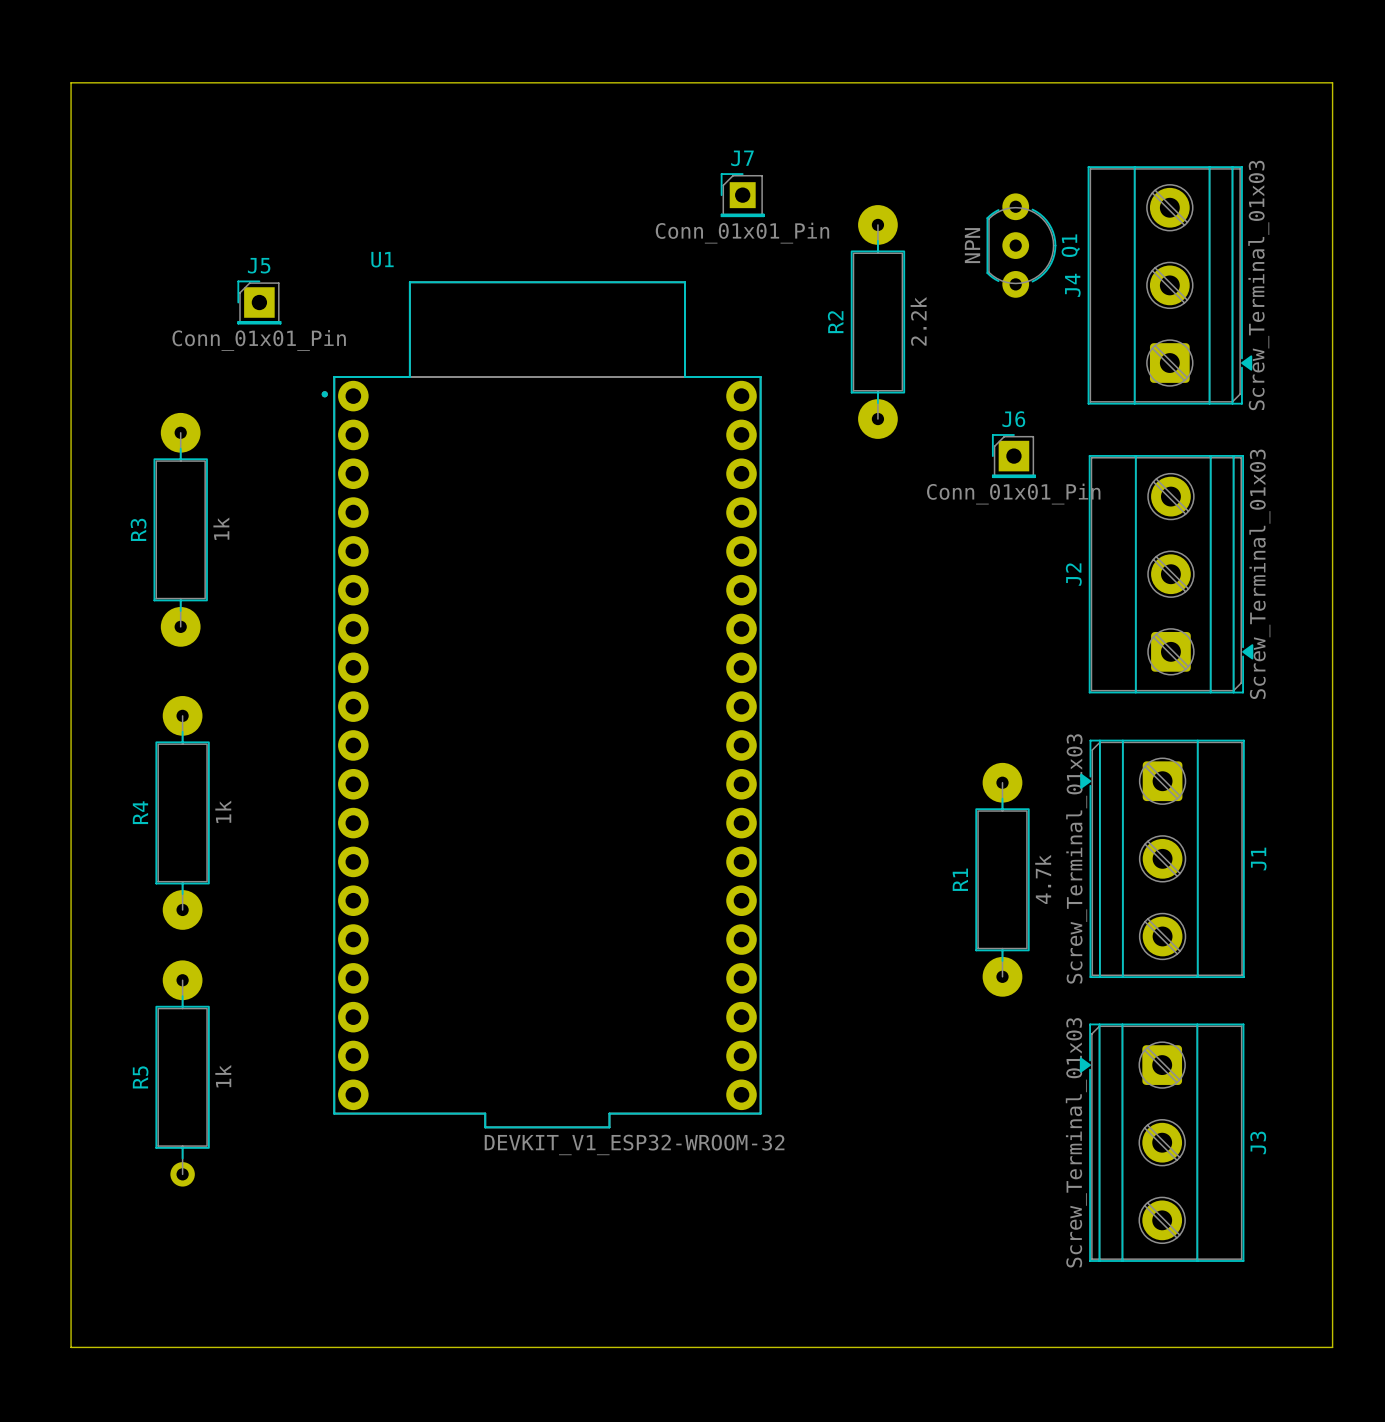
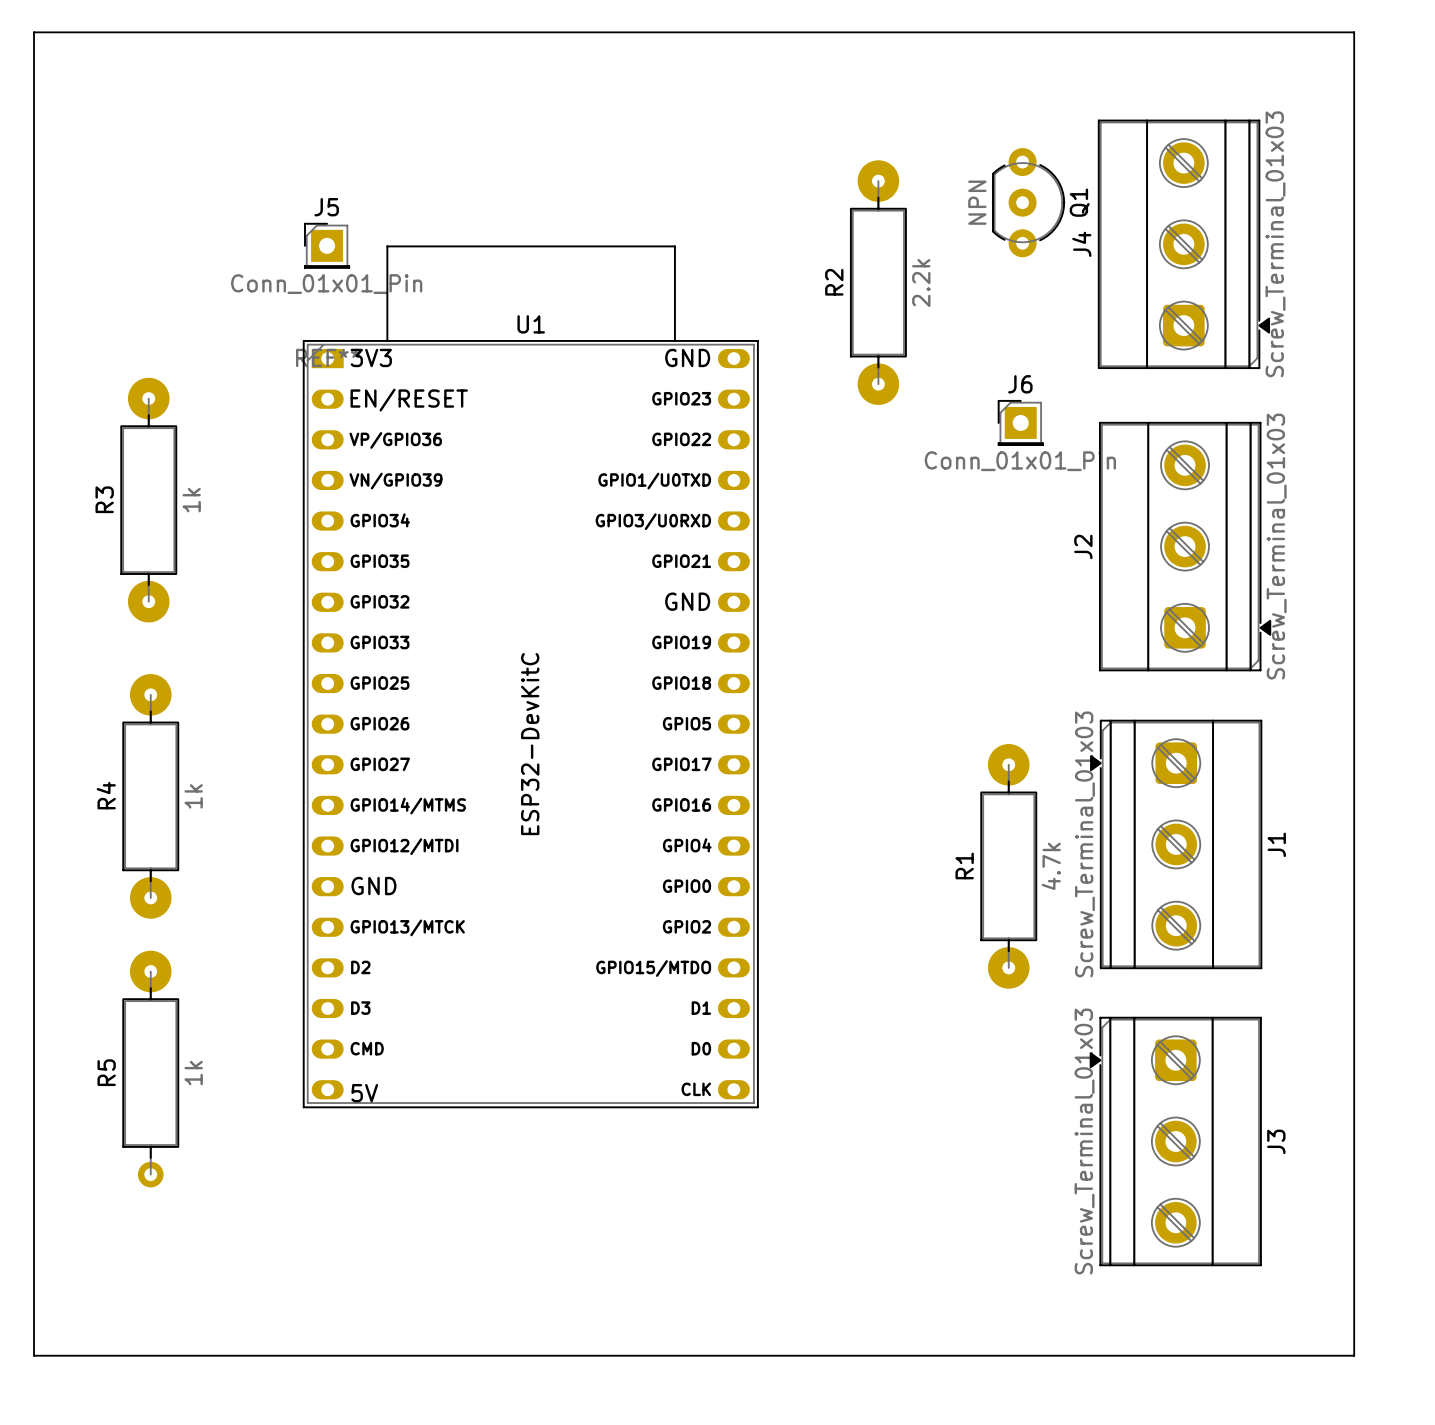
J7: Conn_01x01_Pin (742, 195) -> none
U1 name position: U1 (382, 259) -> U1 (531, 324)
U1 footprint: [321, 281, 762, 1129] -> [302, 245, 759, 1109]
J5 position: (259, 302) -> (327, 245)
U1 value: DEVKIT_V1_ESP32-WROOM-32 (634, 1144) -> ESP32-DevKitC (530, 744)

